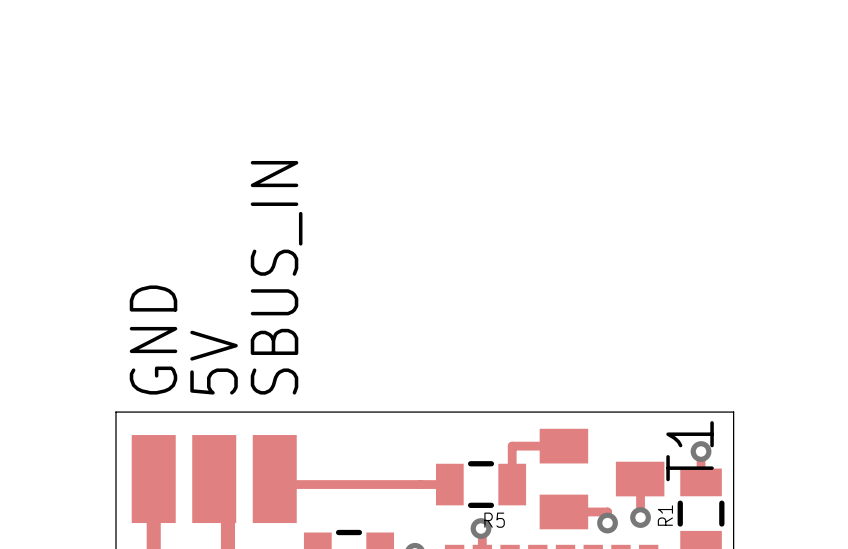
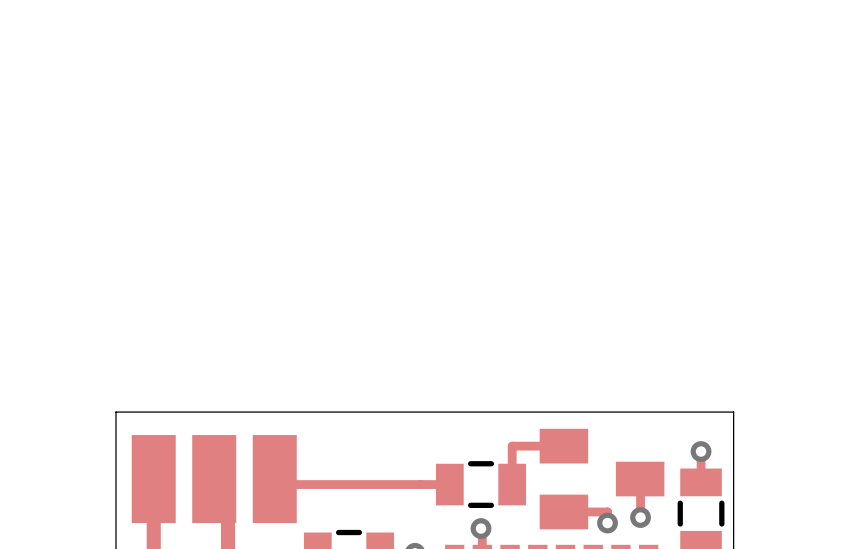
SBUS_IN name: SBUS_IN (276, 277) -> none
GND name: GND (153, 340) -> none
5V name: 5V (214, 362) -> none
T1 name: T1 (690, 451) -> none
R1 name: R1 (665, 515) -> none
R5 name: R5 (494, 520) -> none

